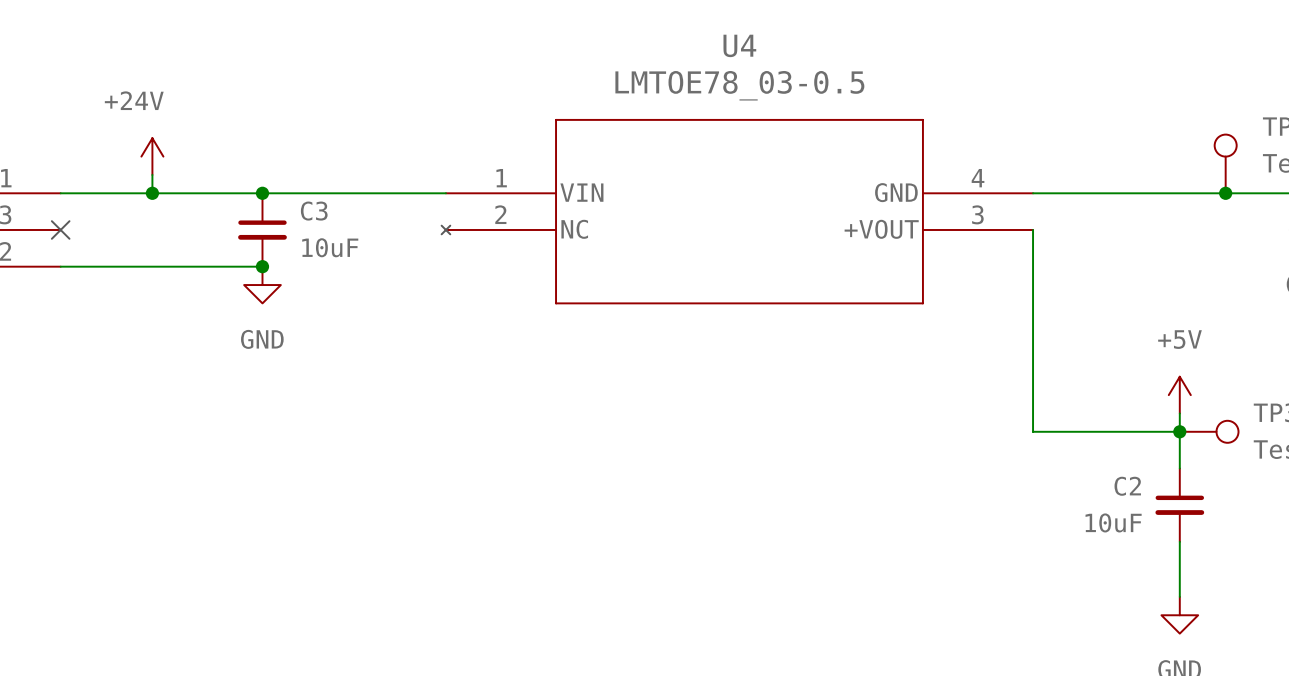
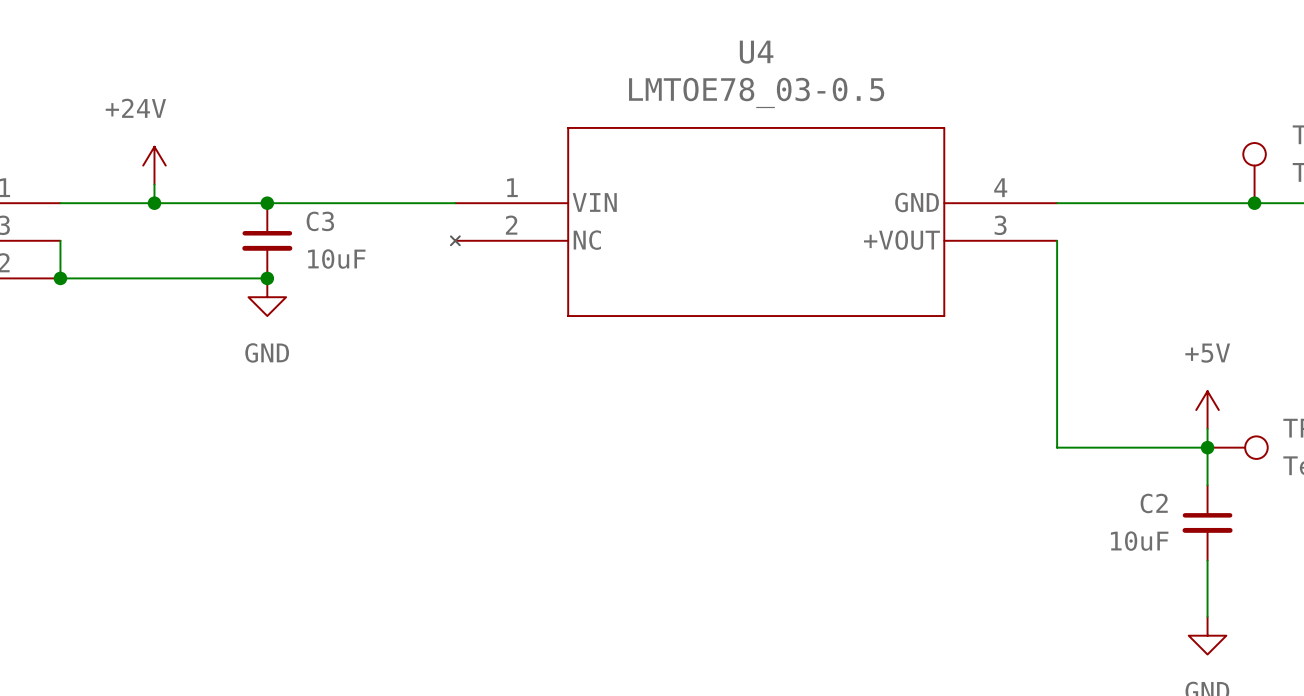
wire: none -> (60, 240) (60, 278)
no-connect mark: (60, 229) -> none
junction: none -> (60, 278)

